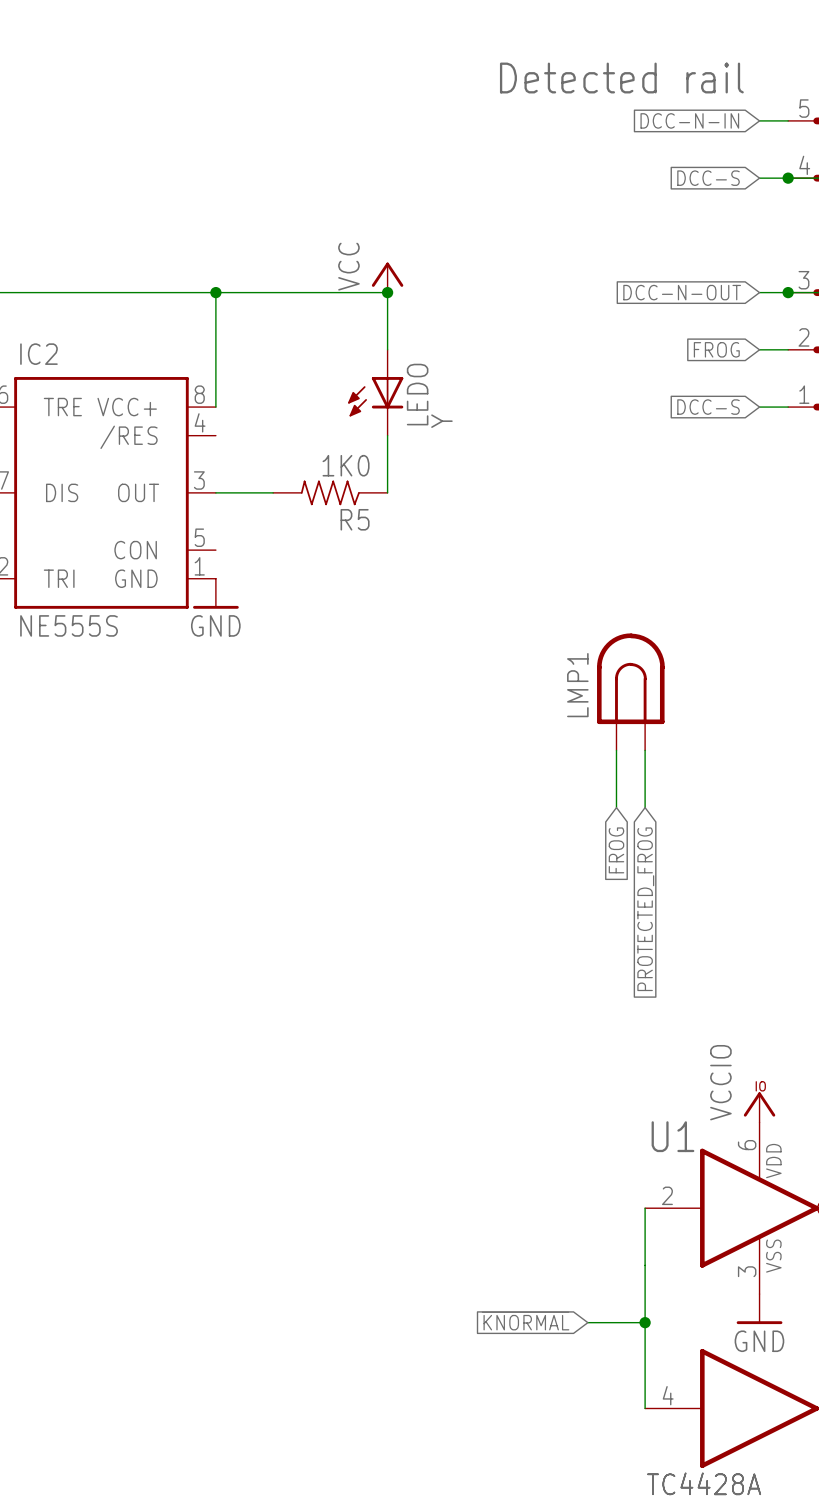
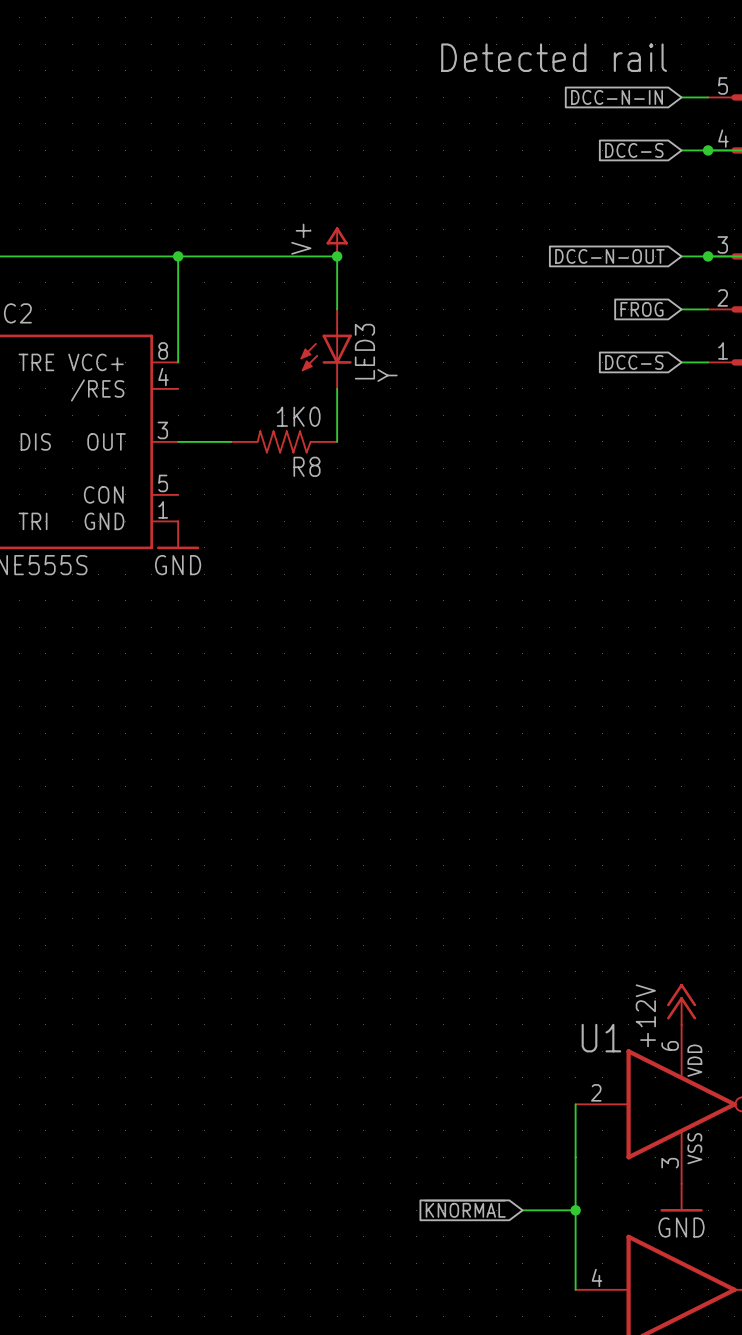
power symbol: VCC (387, 277) -> V+ (337, 241)
LEDO name: LEDO (417, 394) -> LED3 (364, 351)
R5 name: R5 (355, 519) -> R8 (307, 466)
LMP1: (630, 691) -> none
wire: (616, 750) (616, 807) -> none
wire: (645, 750) (645, 807) -> none
global label: FROG (616, 850) -> none
global label: PROTECTED_FROG (645, 909) -> none
power symbol: VCCIO (759, 1107) -> +12V (681, 1004)

